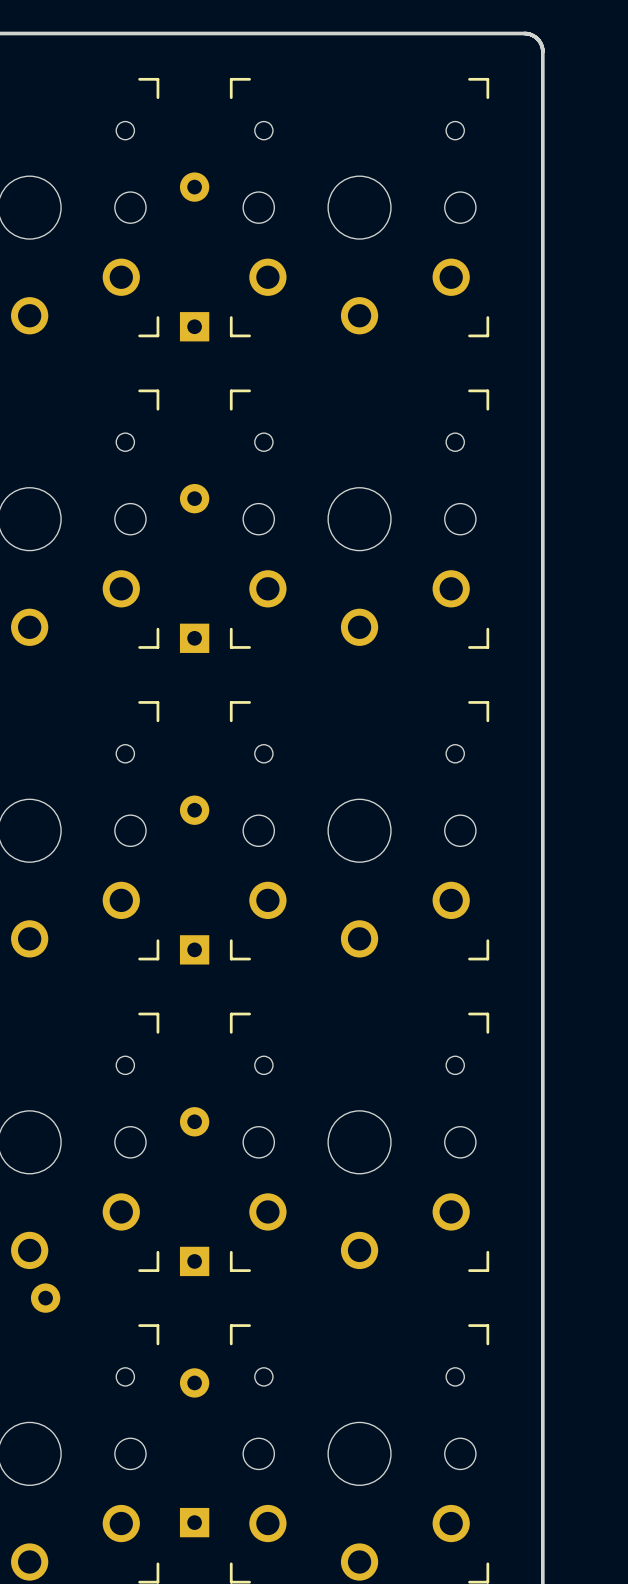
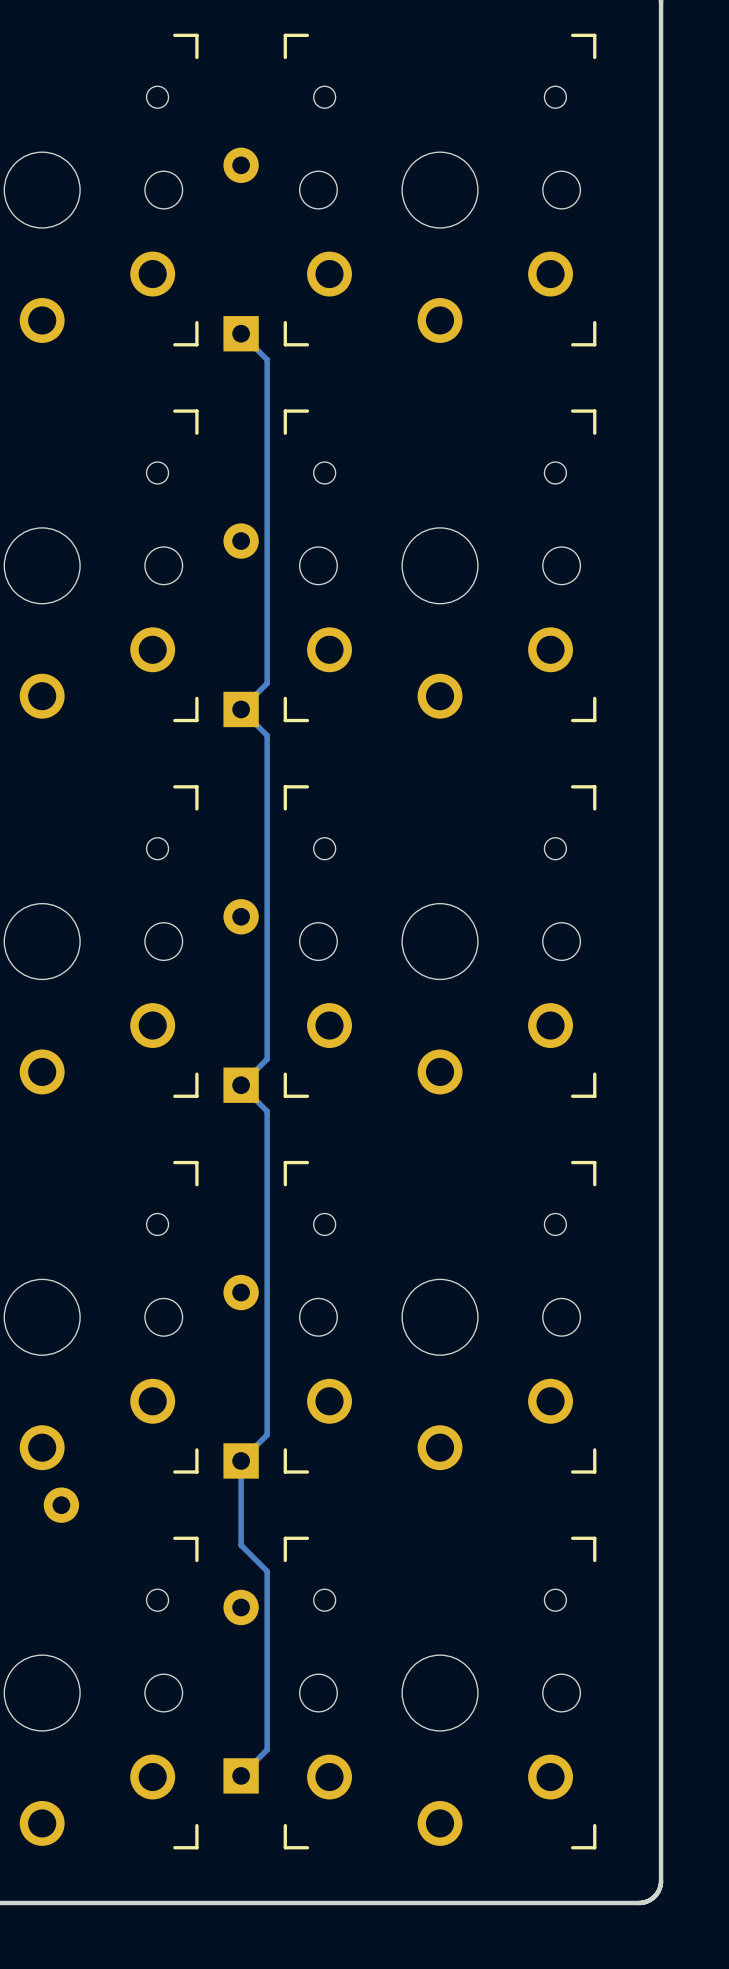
track: none -> (241, 333) (267, 359) (267, 683) (241, 709) (267, 735) (267, 1059) (241, 1085) (267, 1111) (267, 1434) (241, 1460) (241, 1545) (267, 1571) (267, 1749) (241, 1775)

